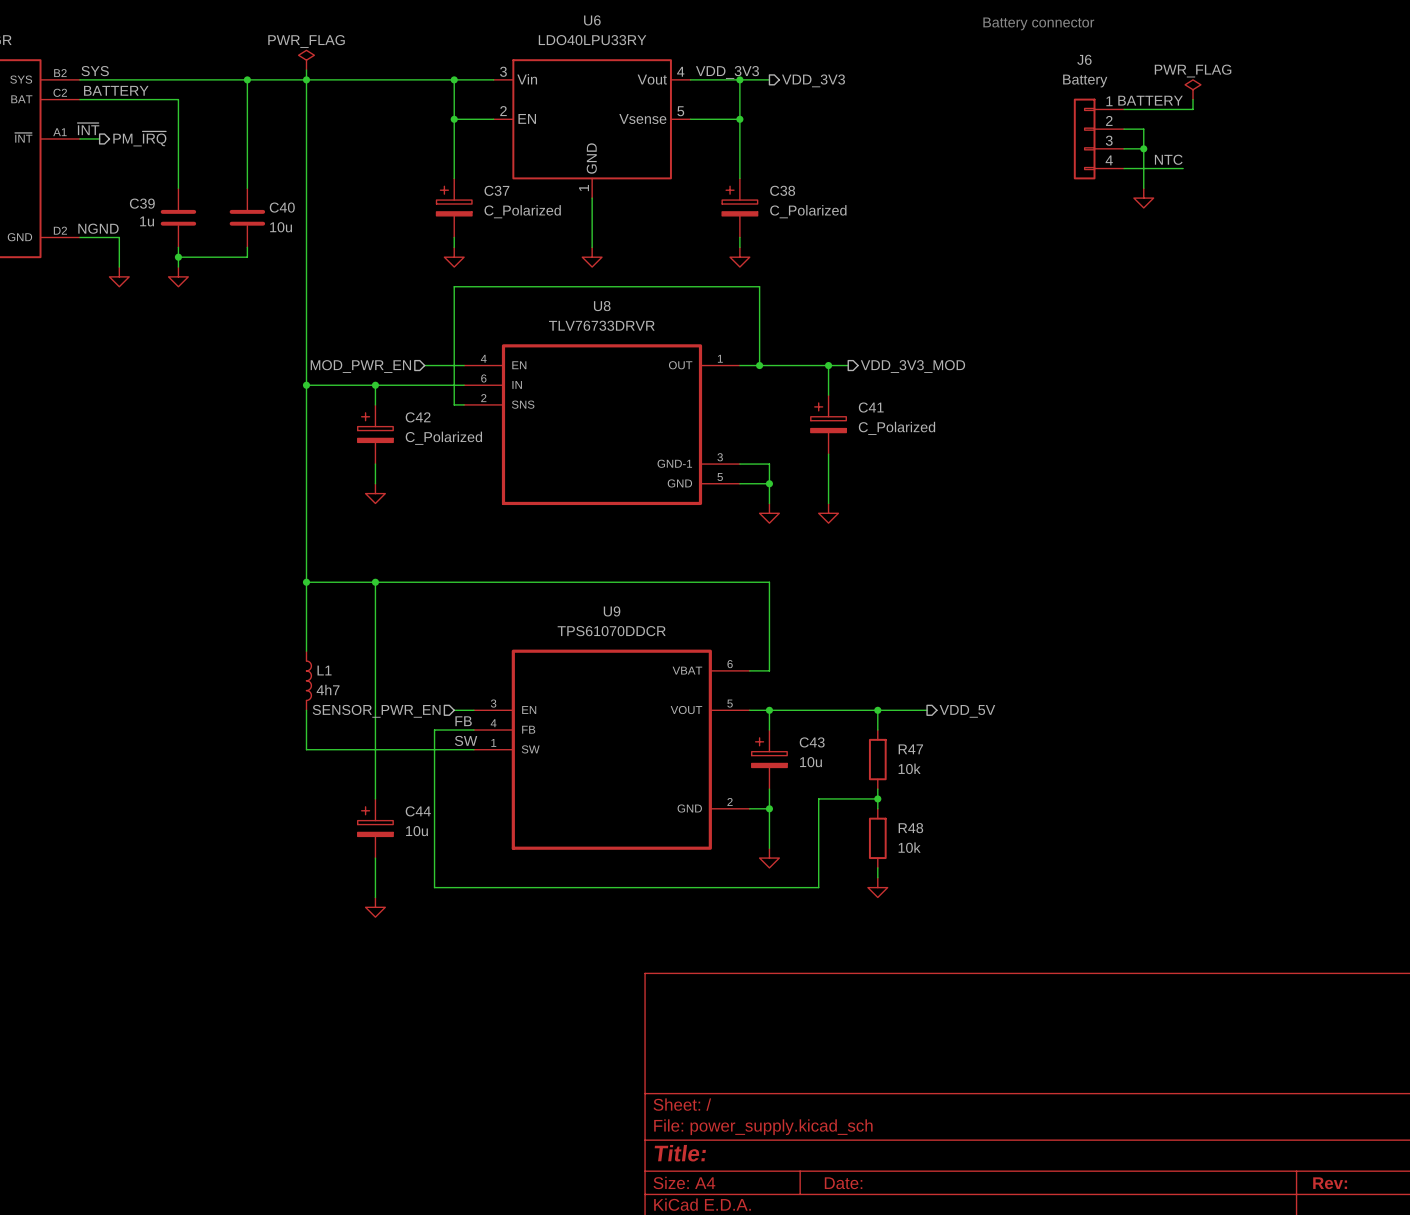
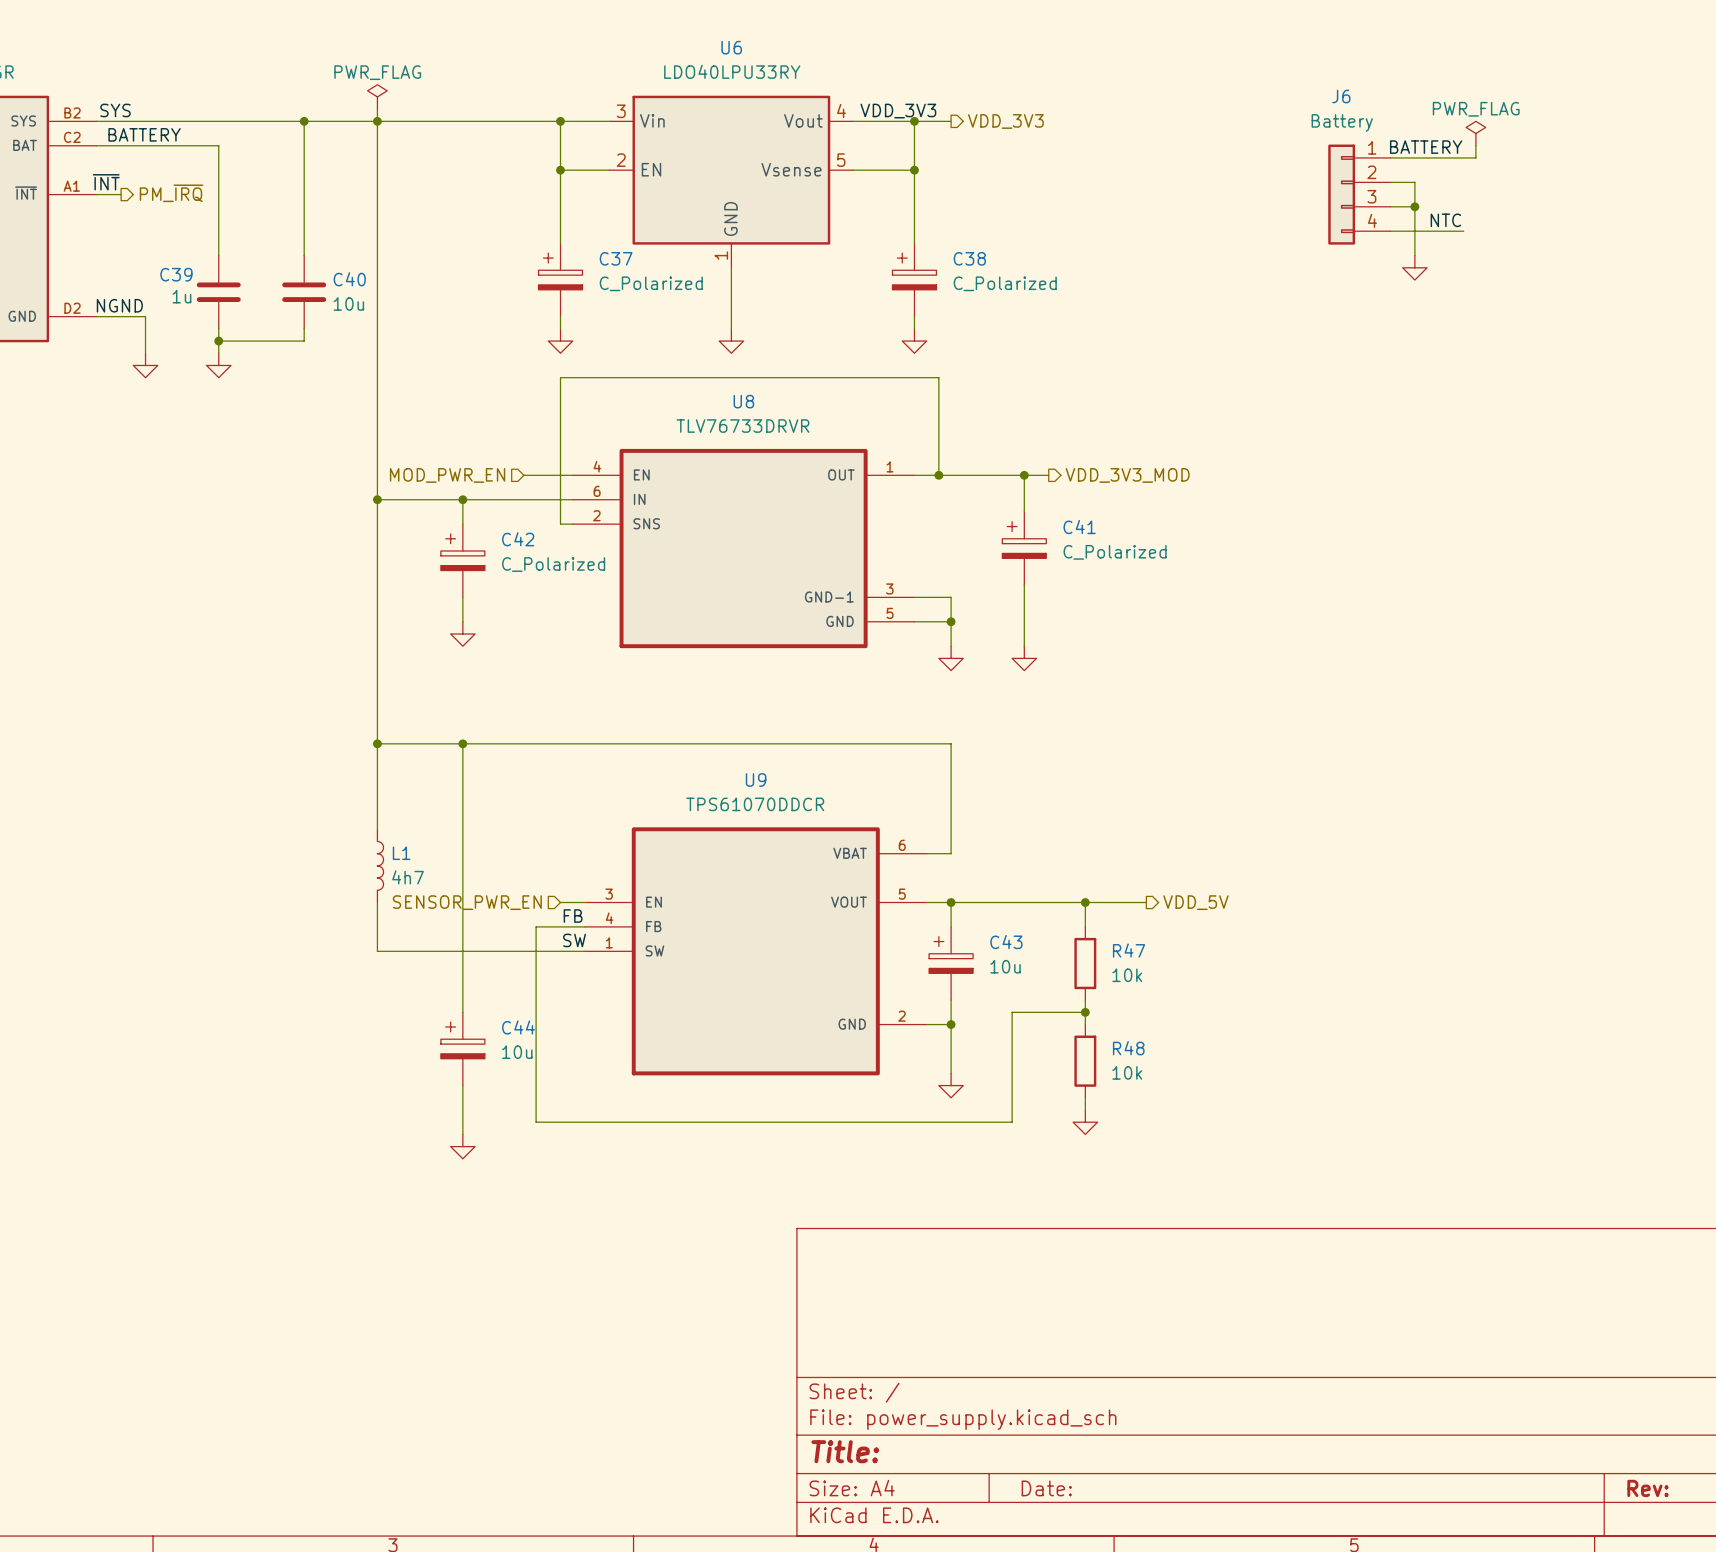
text: Battery connector (1038, 23) -> none

